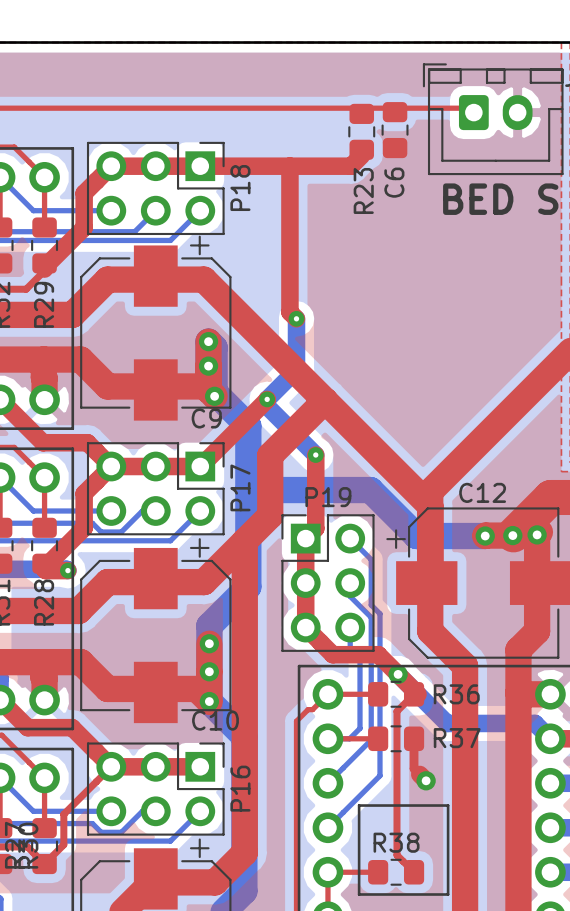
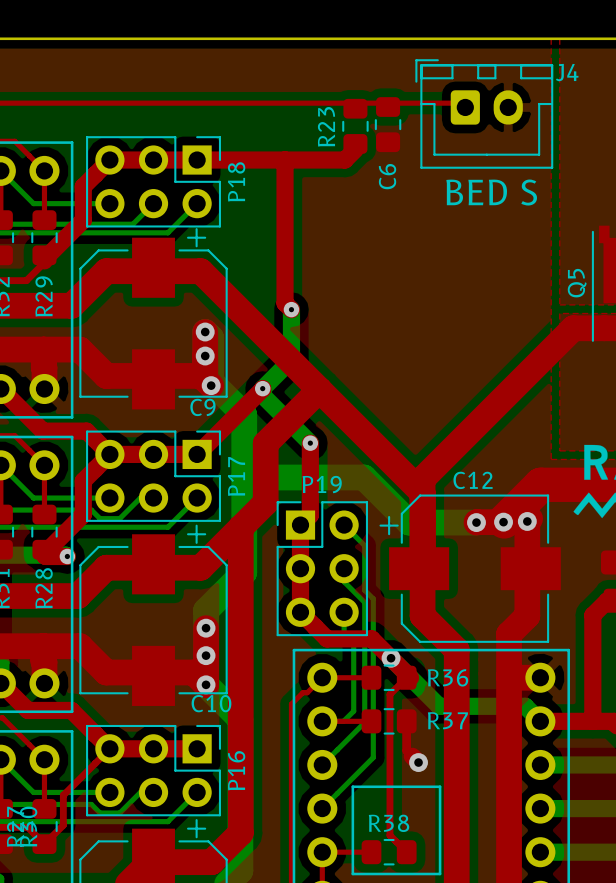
R23 name position: R23 (363, 190) -> R23 (326, 126)

